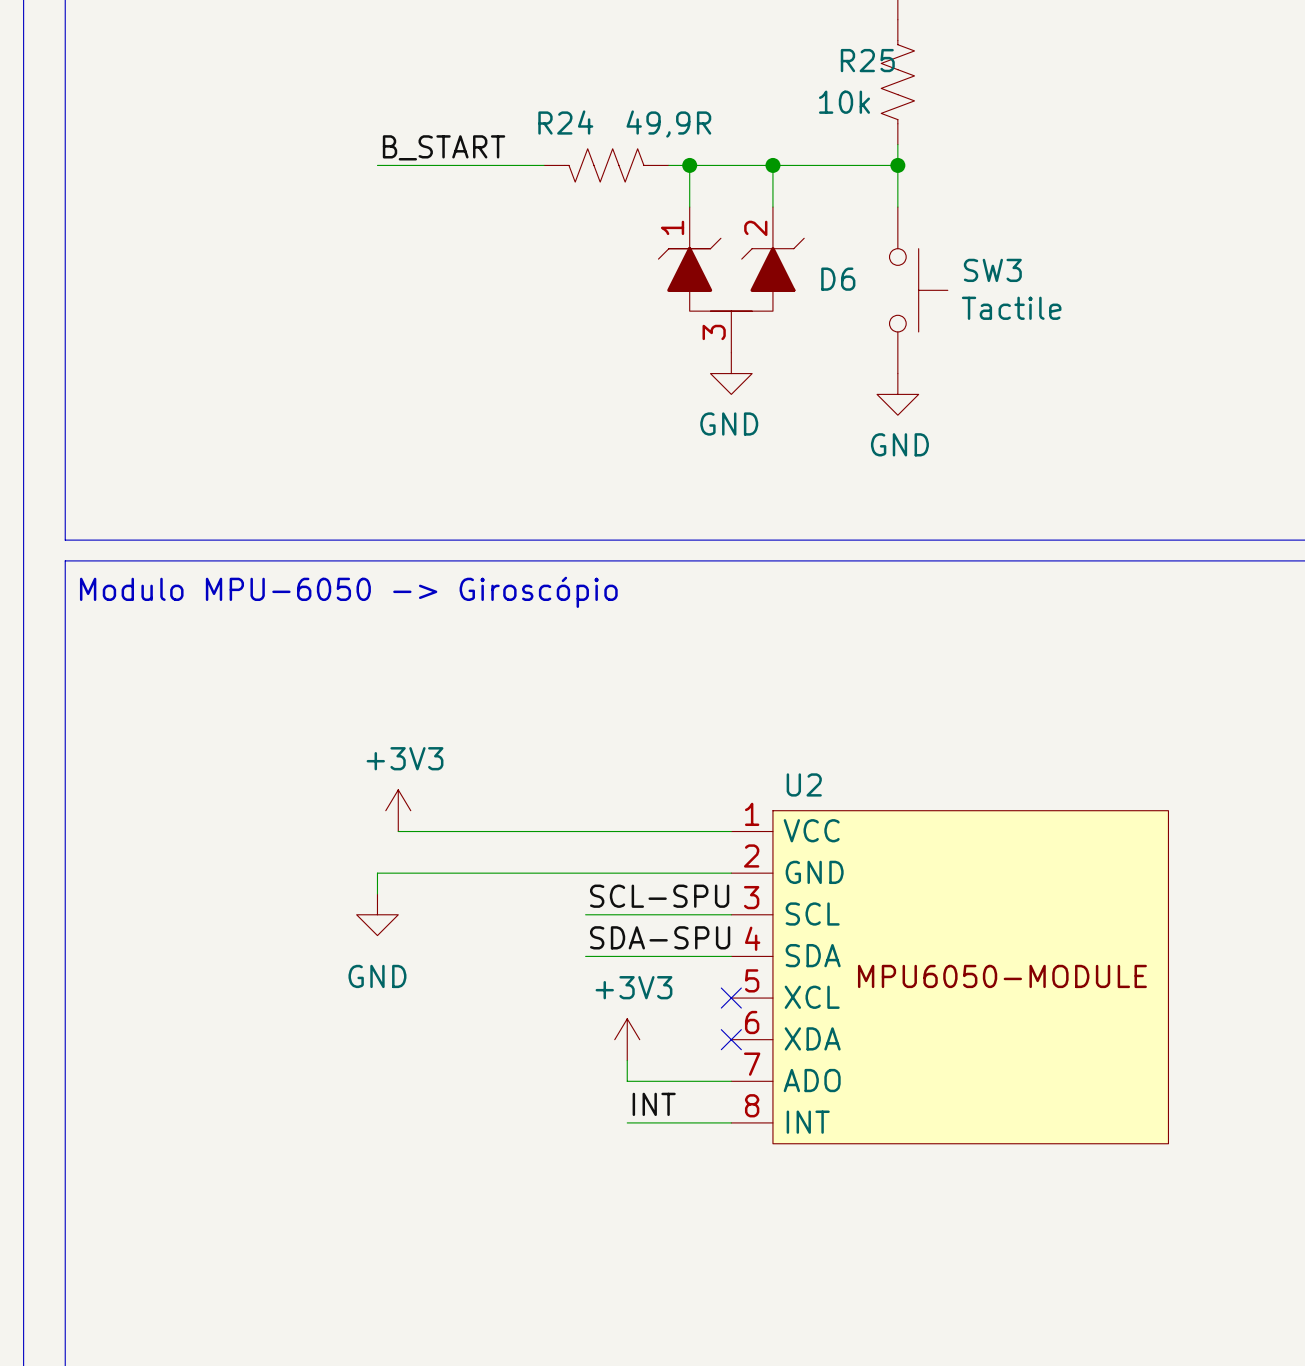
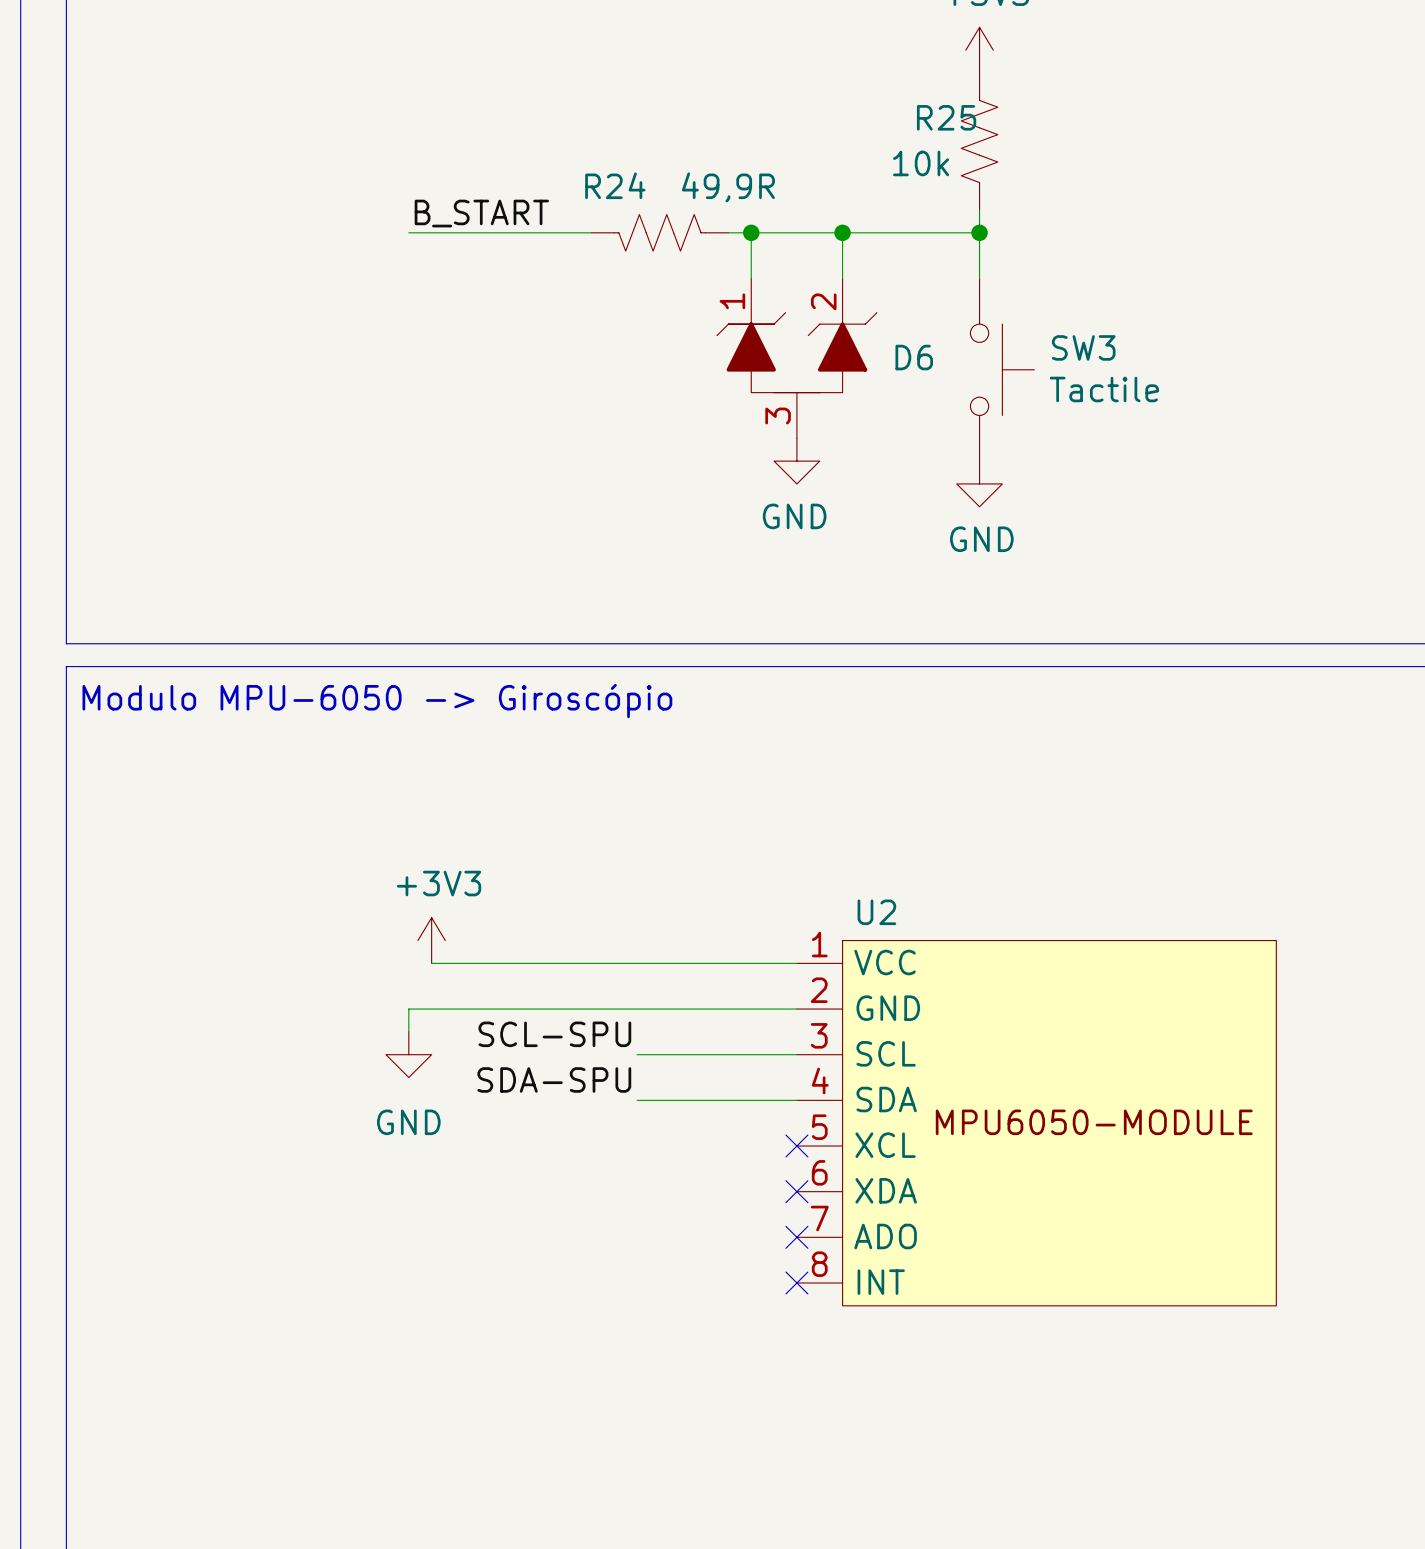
label position: SCL-SPU (659, 896) -> SCL-SPU (554, 1034)
label position: SDA-SPU (660, 937) -> SDA-SPU (554, 1079)
power symbol: +3V3 (627, 1039) -> none
wire: (627, 1060) (627, 1081) (731, 1081) -> none
no-connect mark: none -> (796, 1237)
label: INT (654, 1104) -> none
wire: (627, 1122) (731, 1122) -> none
no-connect mark: none -> (796, 1282)

